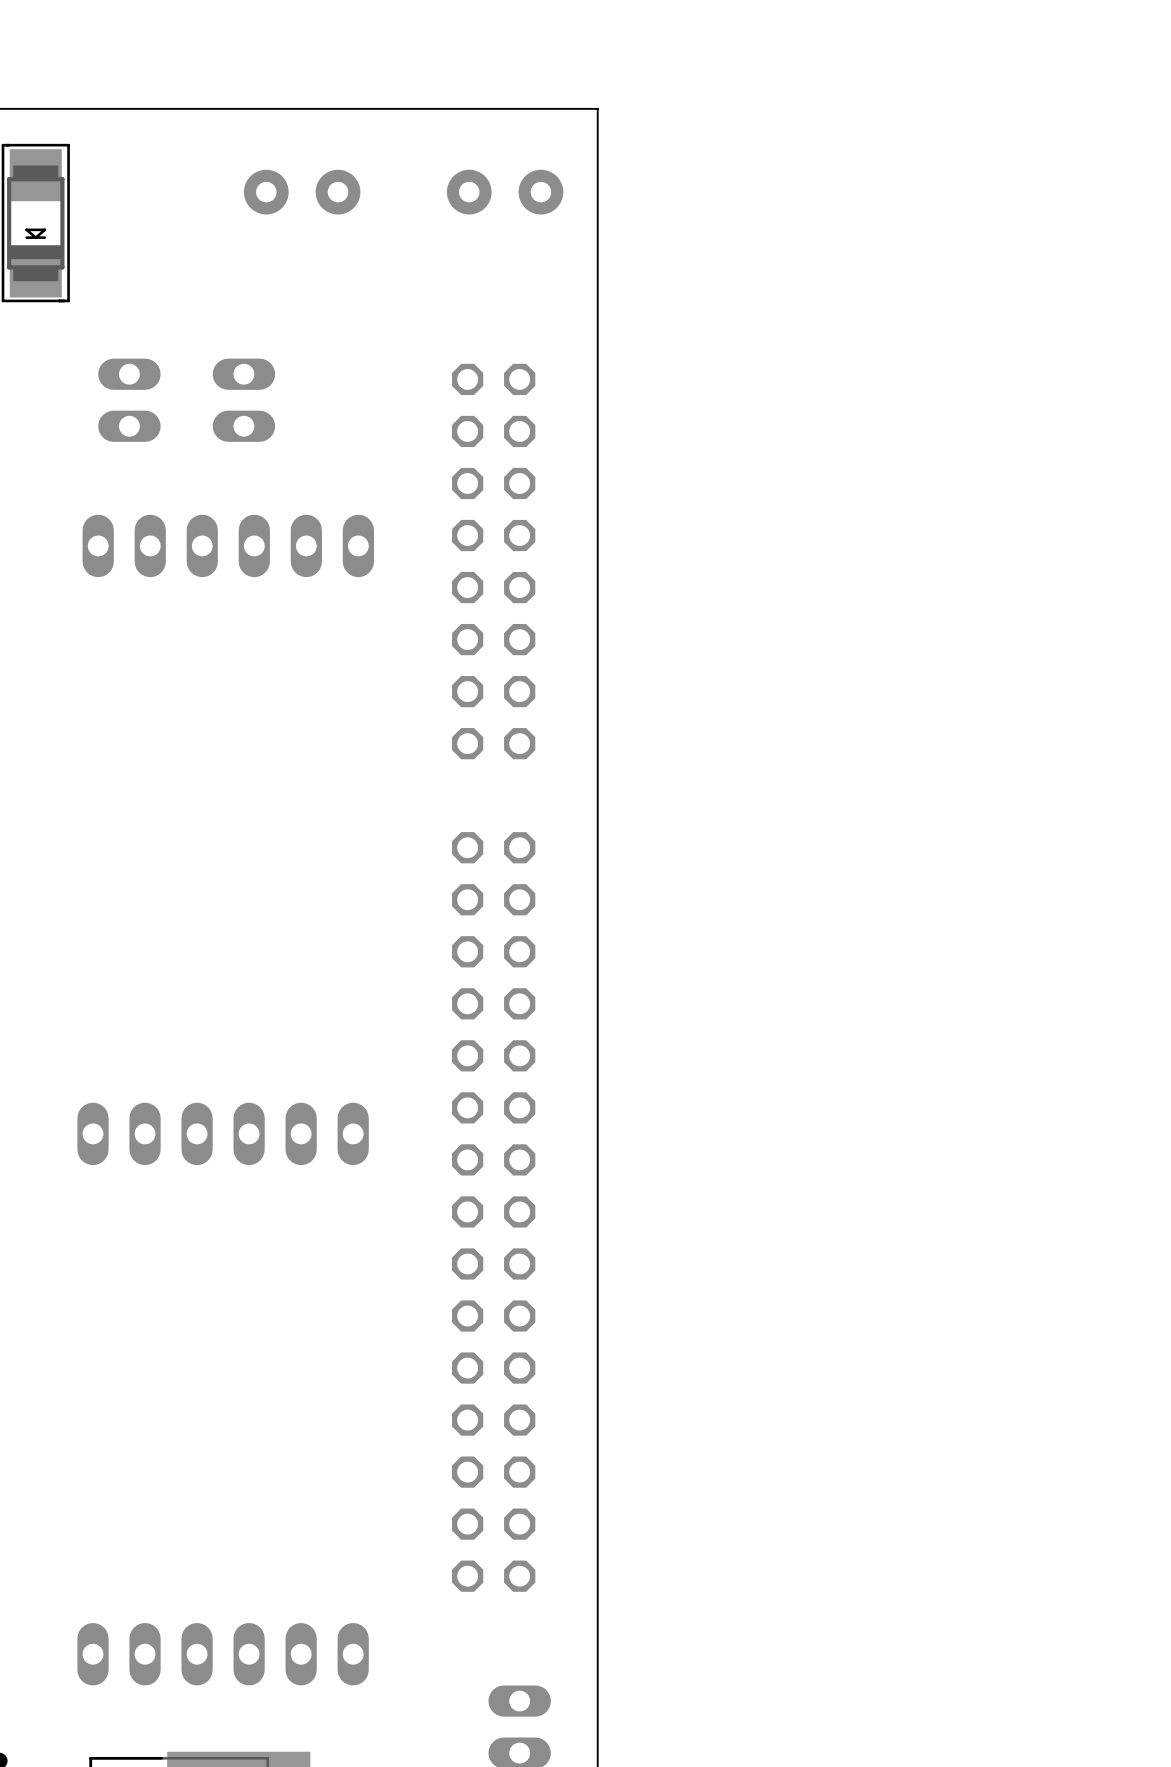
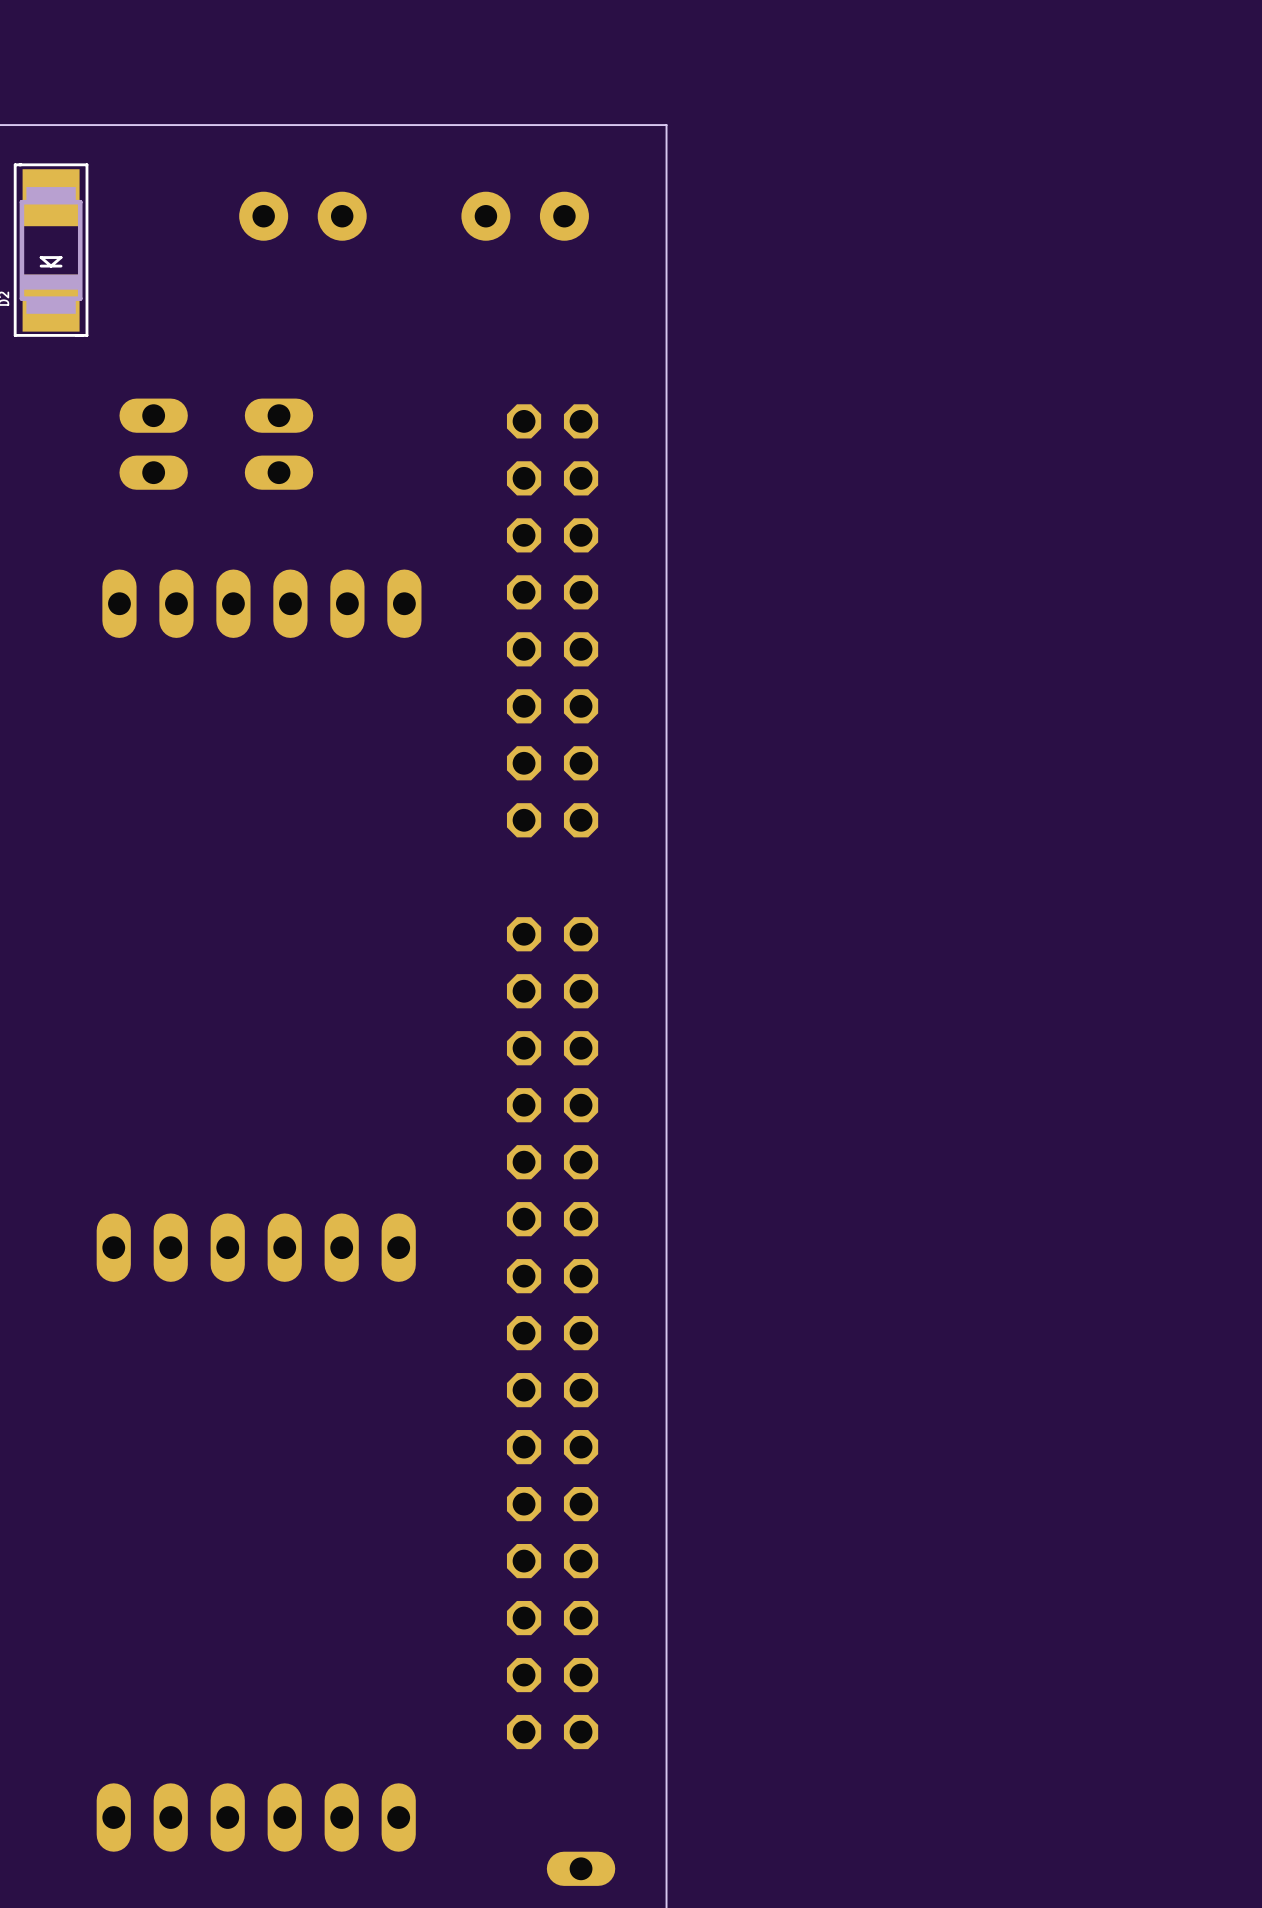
part position: (302, 192) -> (302, 216)
part position: (505, 192) -> (525, 216)

